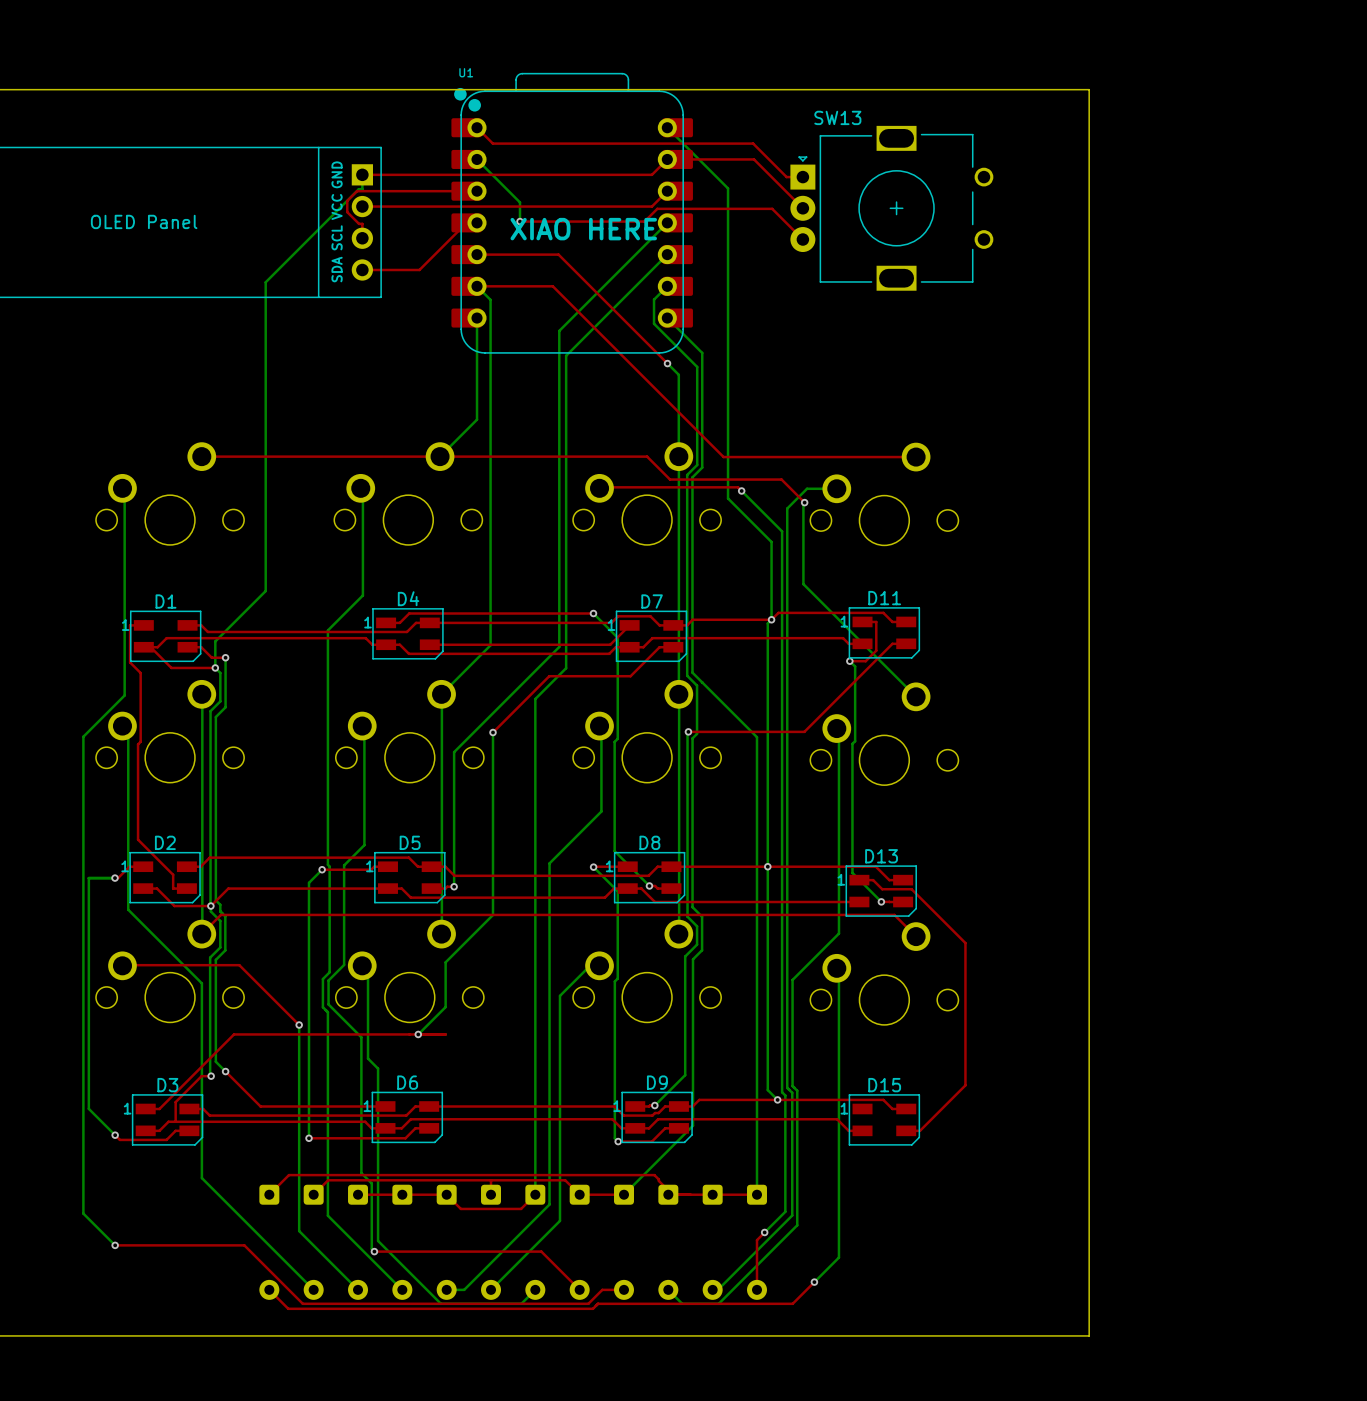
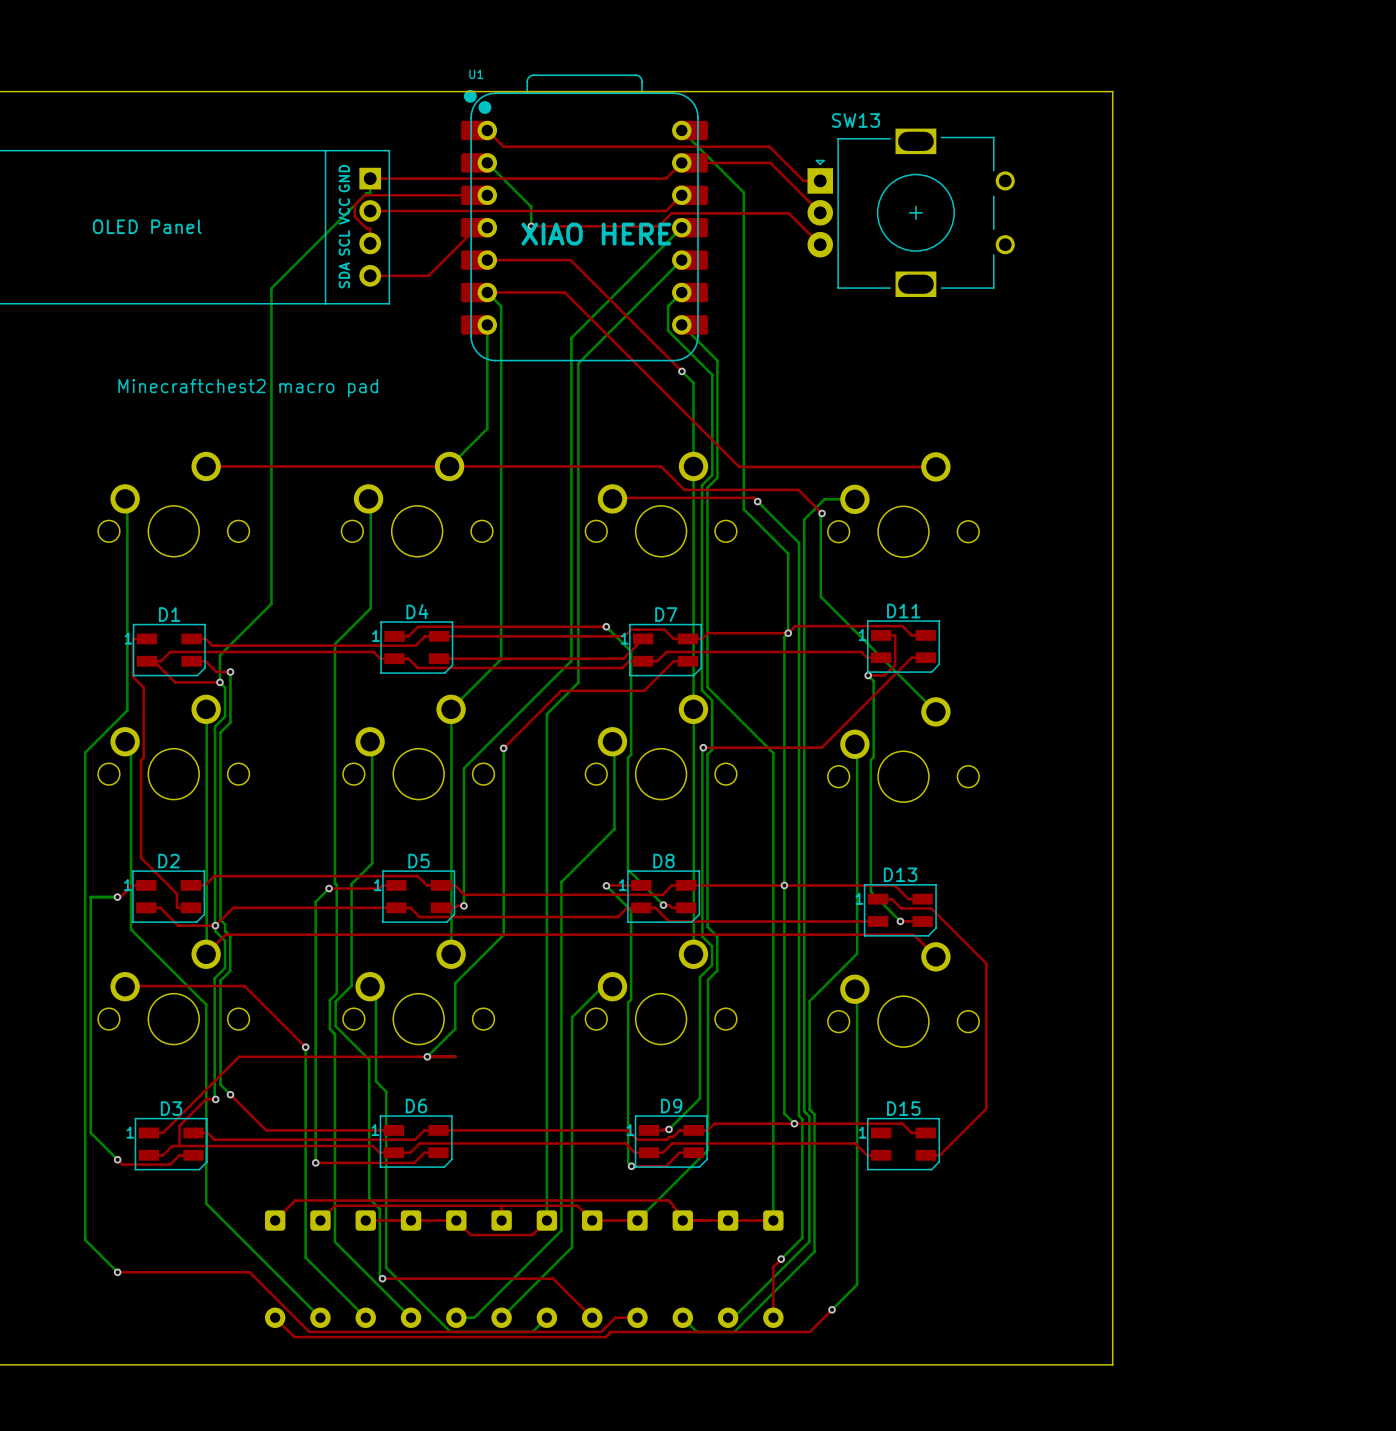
text: none -> Minecraftchest2 macro pad (248, 388)

